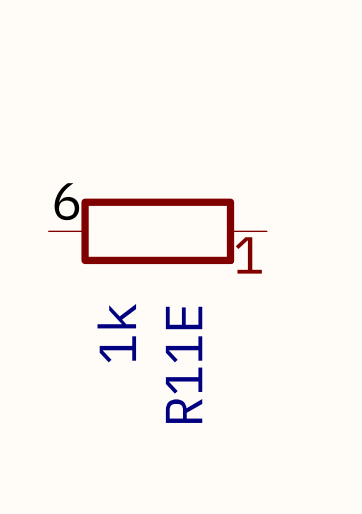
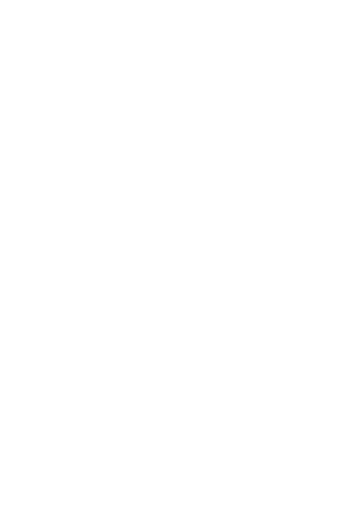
R11E: 1k (157, 231) -> none

